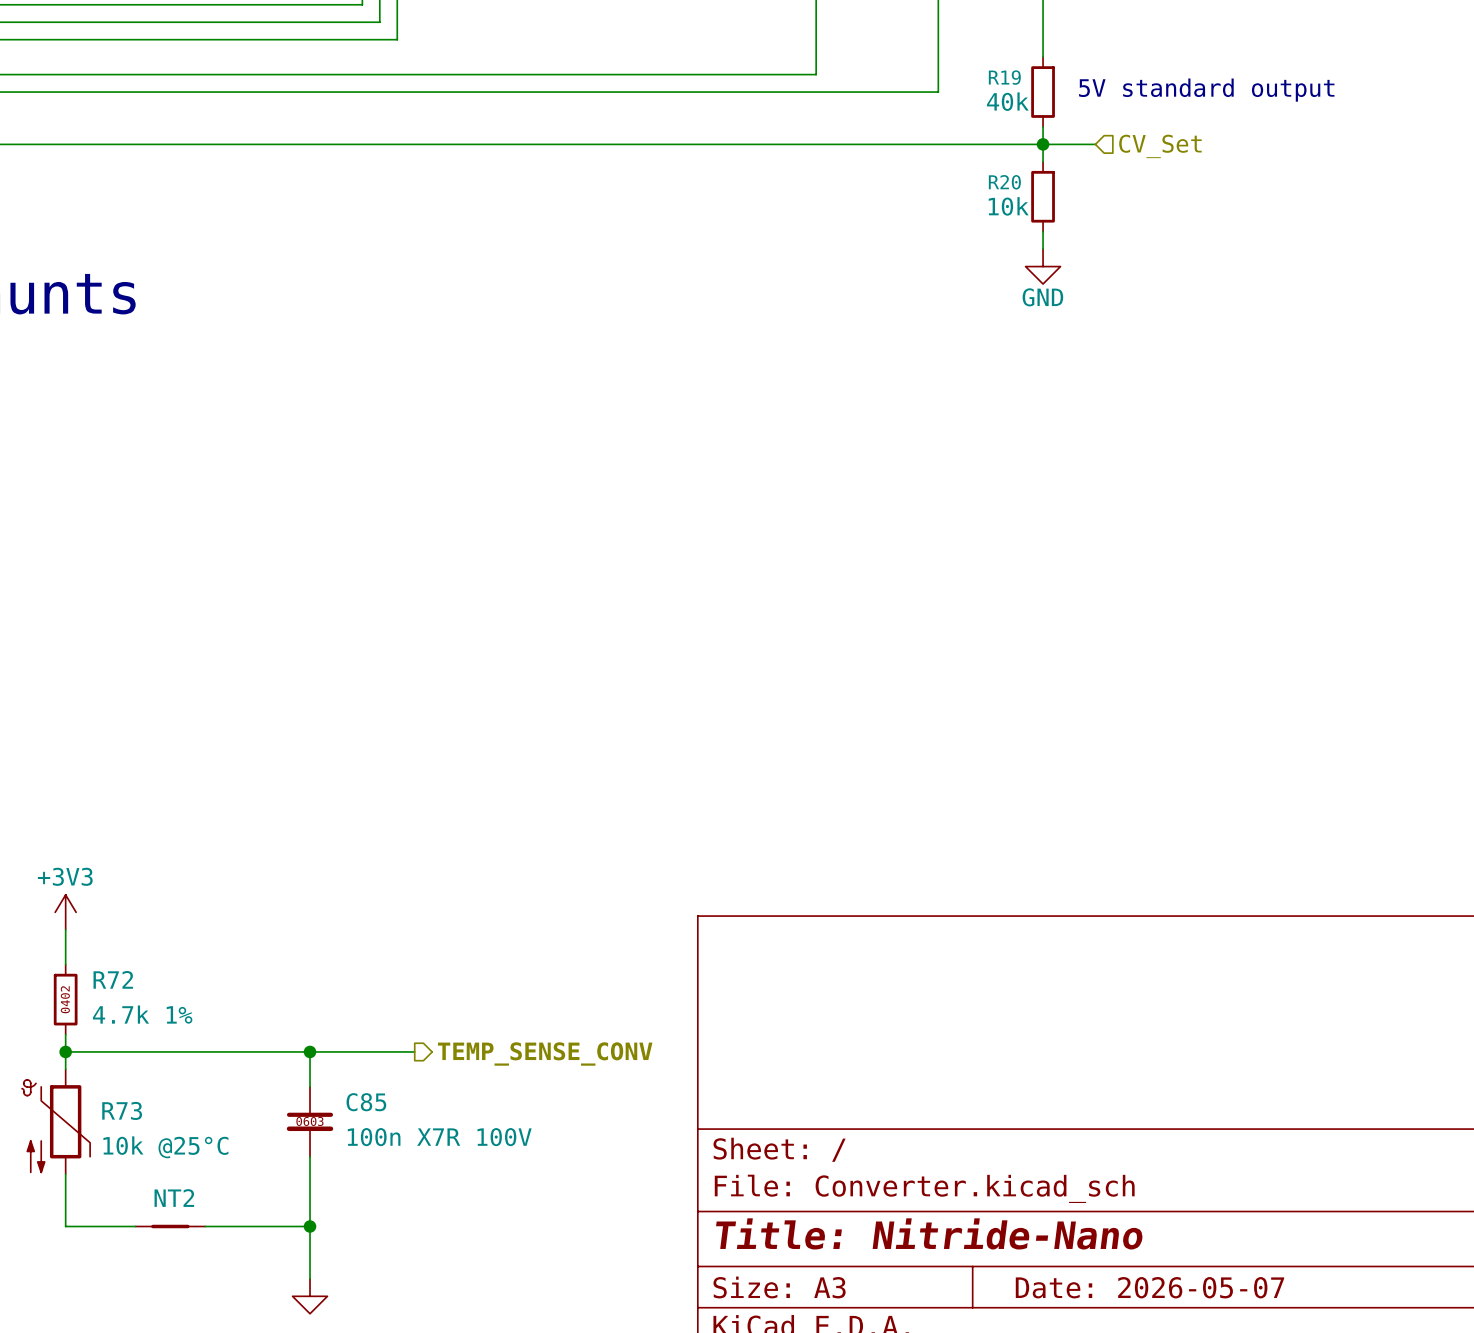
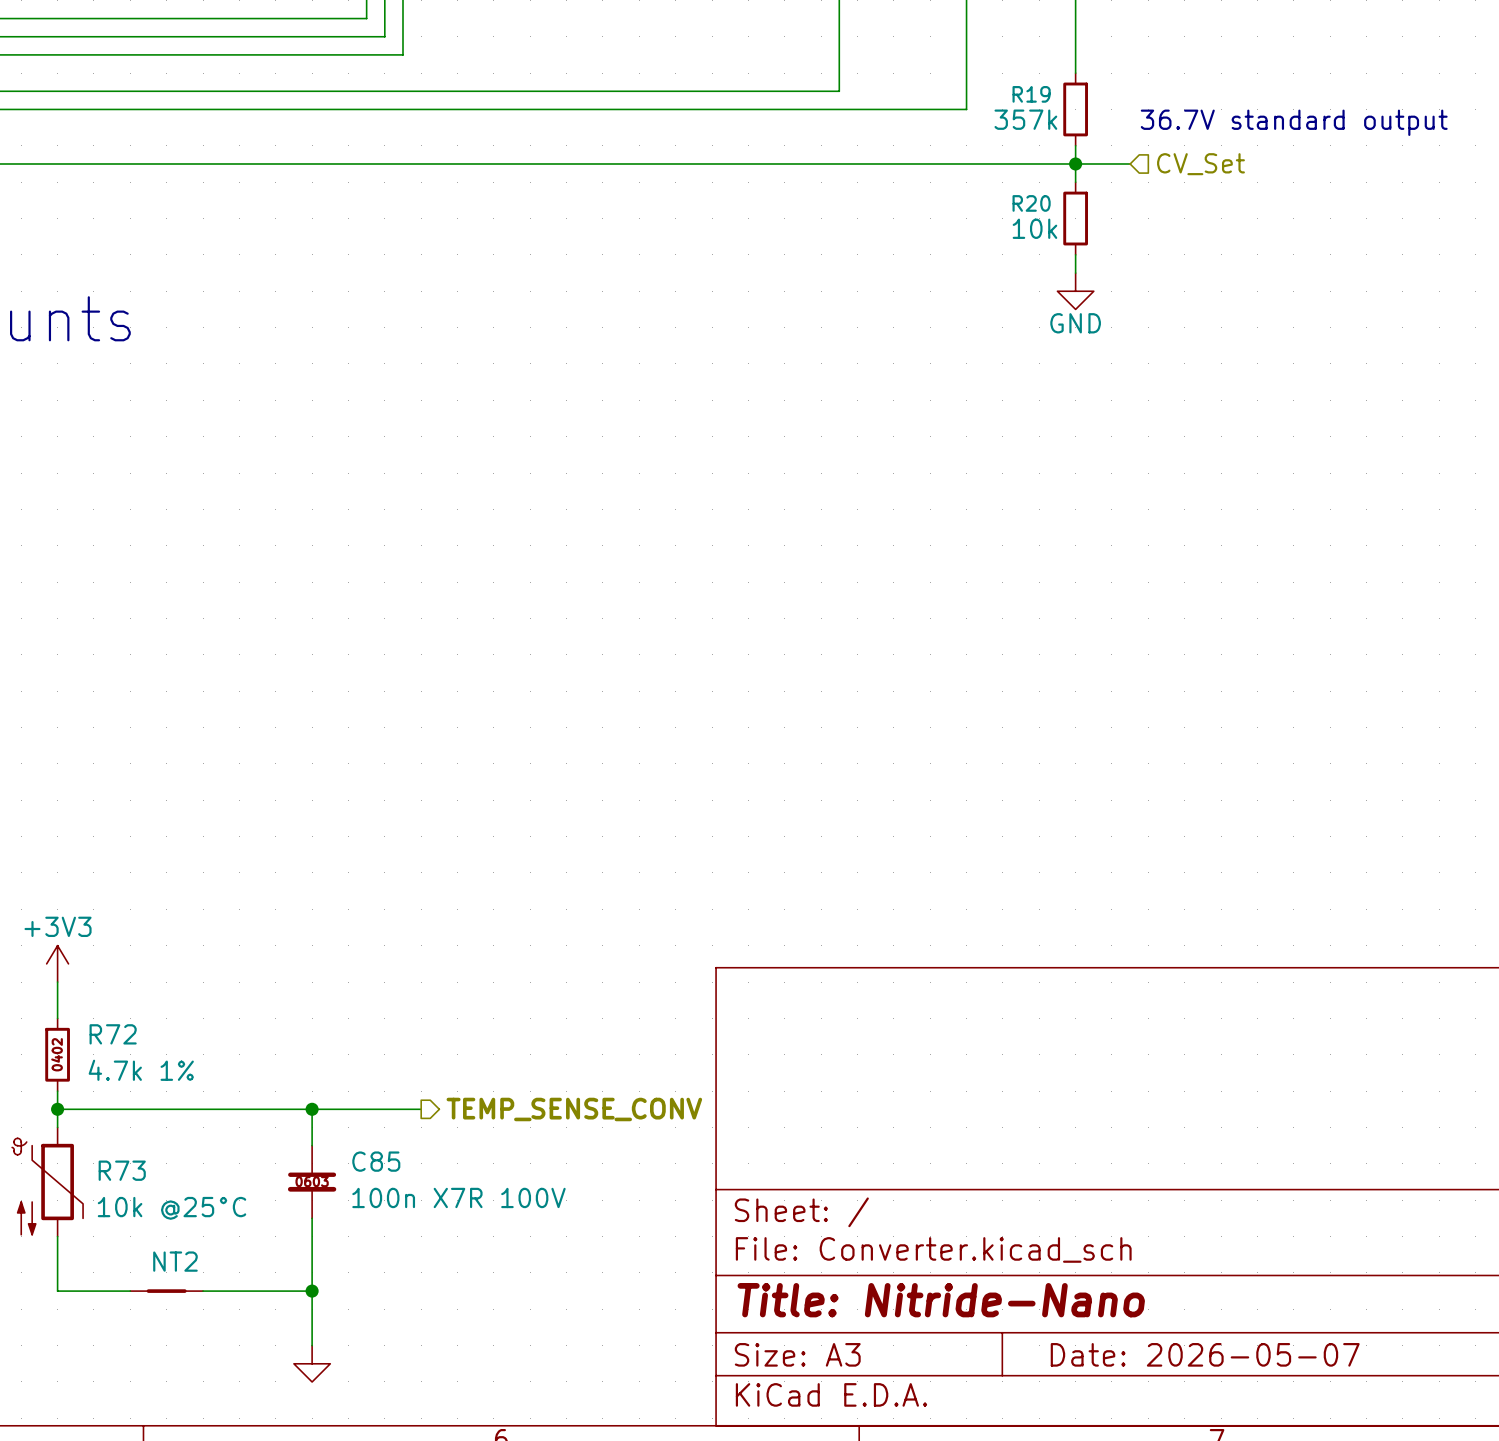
text: 5V standard output (1206, 90) -> 36.7V standard output (1294, 122)
R19 value: 40k (1007, 101) -> 357k (1025, 119)

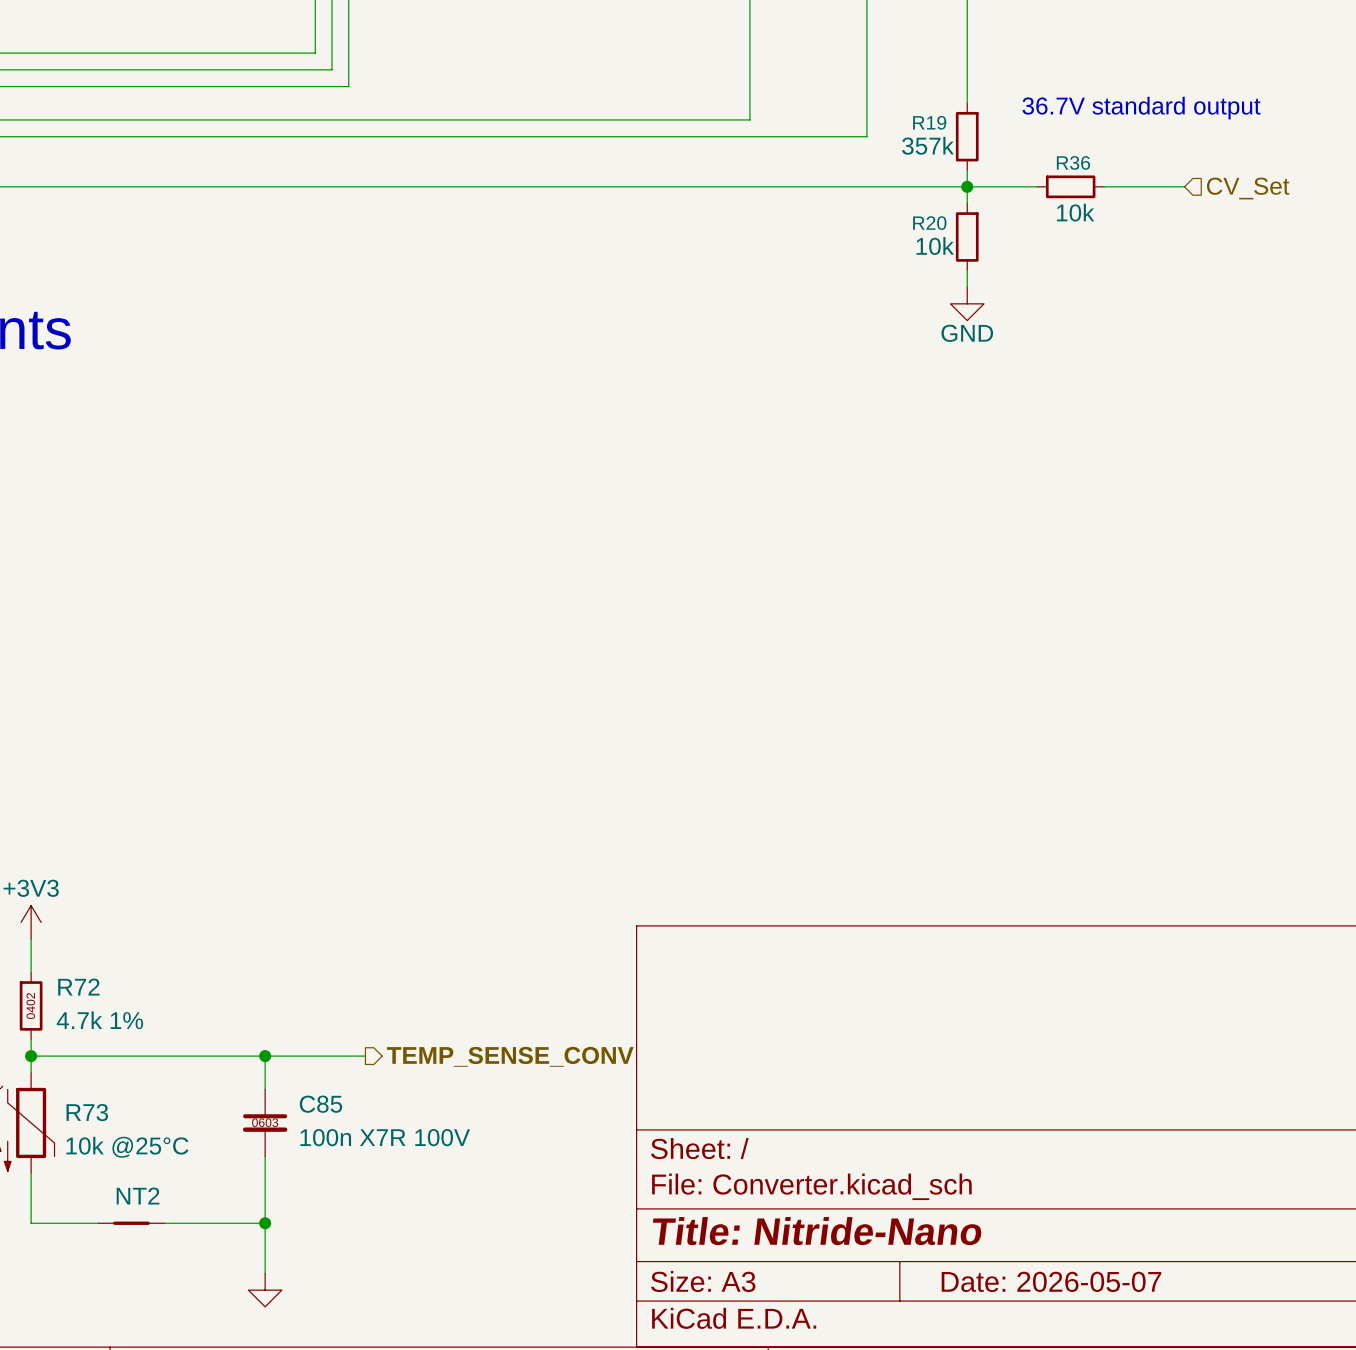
text position: 36.7V standard output (1294, 122) -> 36.7V standard output (1141, 108)
wire: none -> (1017, 186) (1037, 186)
R36: none -> 10k (1070, 186)
wire: none -> (1104, 186) (1184, 186)
hierarchical label position: CV_Set (1200, 164) -> CV_Set (1248, 188)

